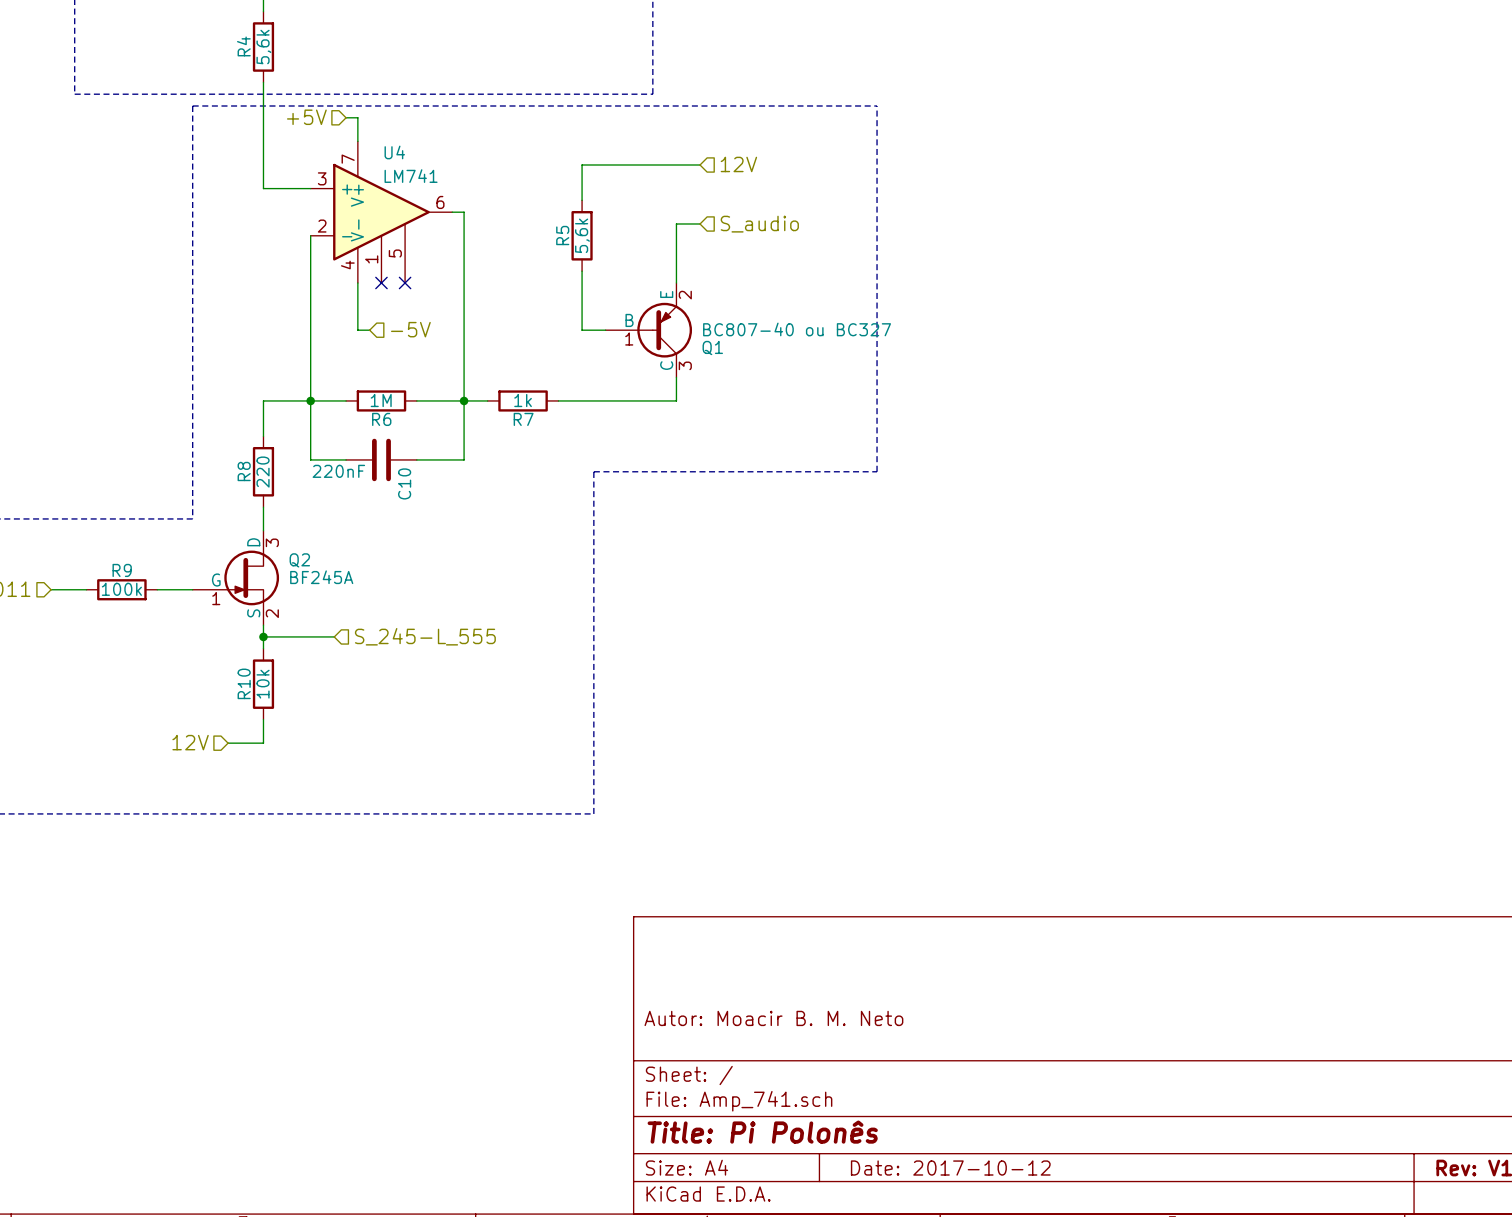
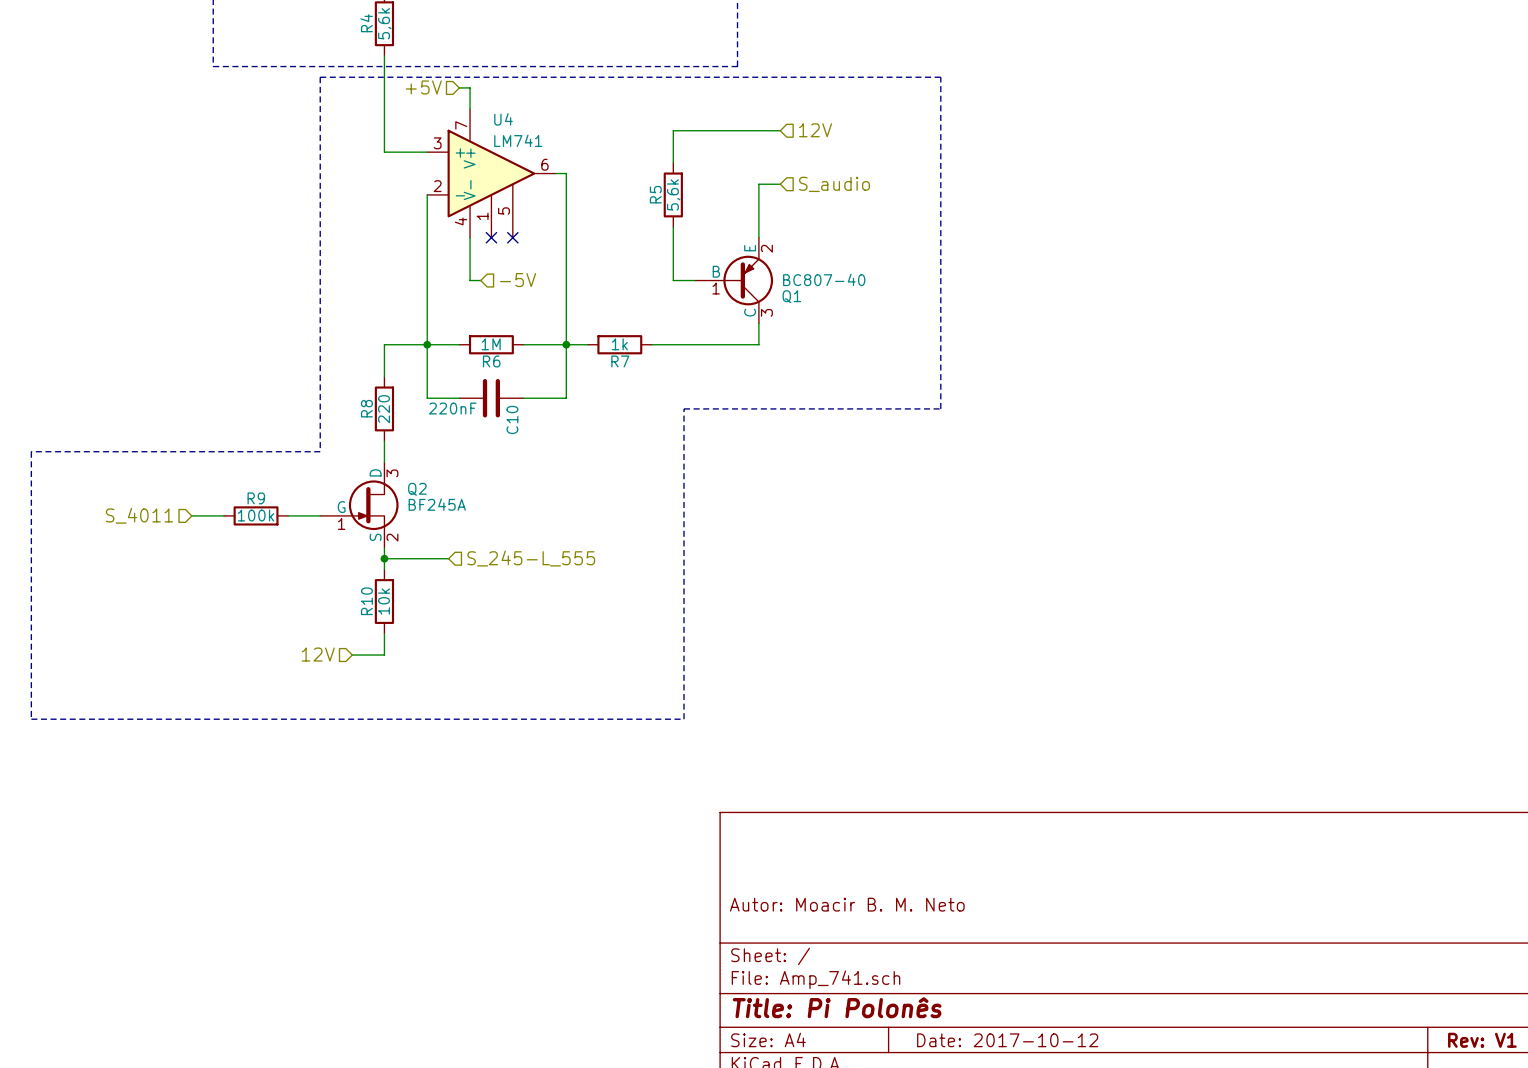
Q1 value: BC807-40 ou BC327 (797, 329) -> BC807-40 (824, 279)

